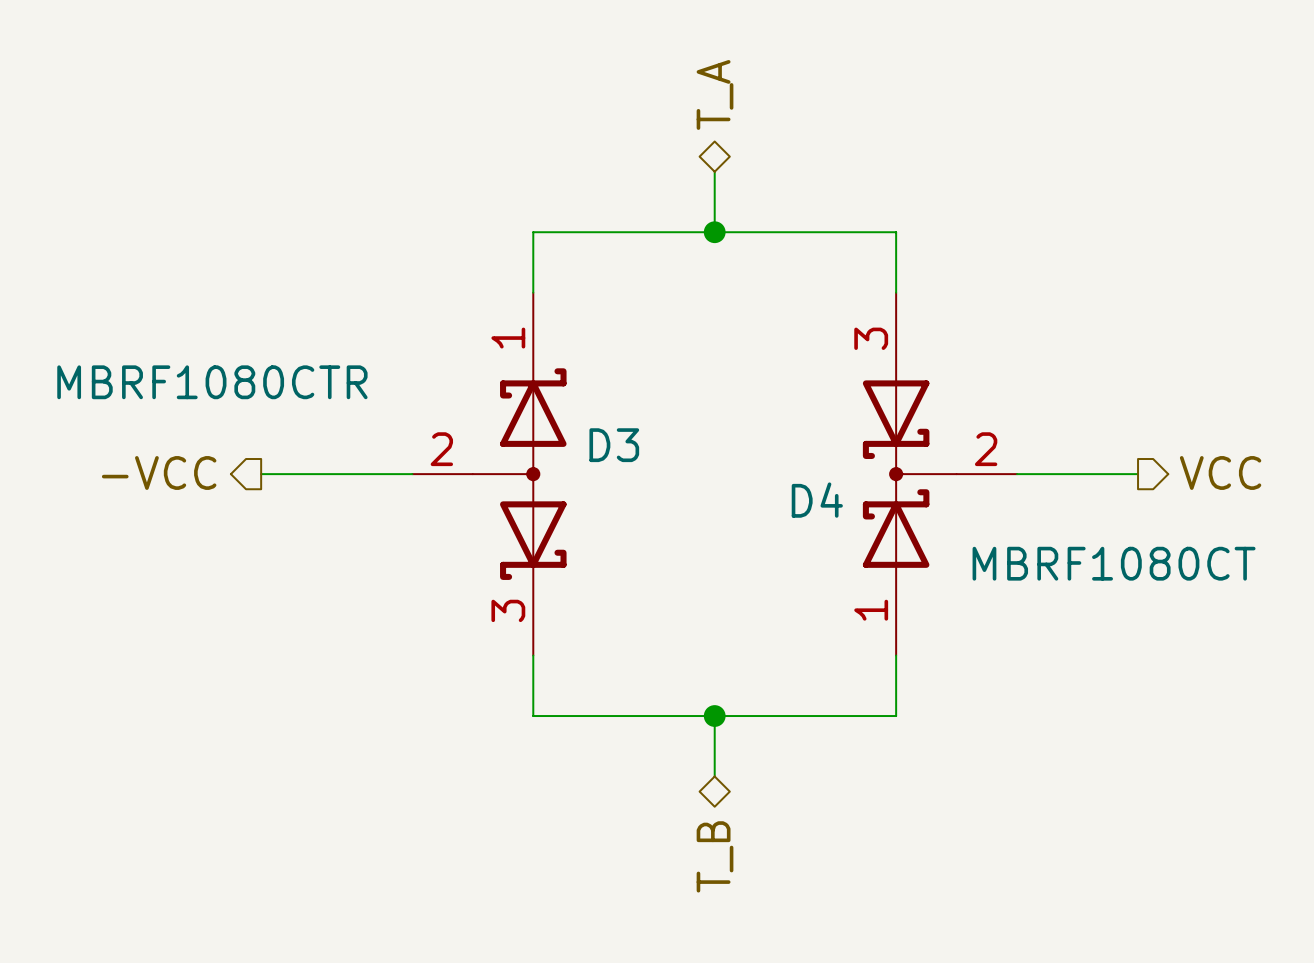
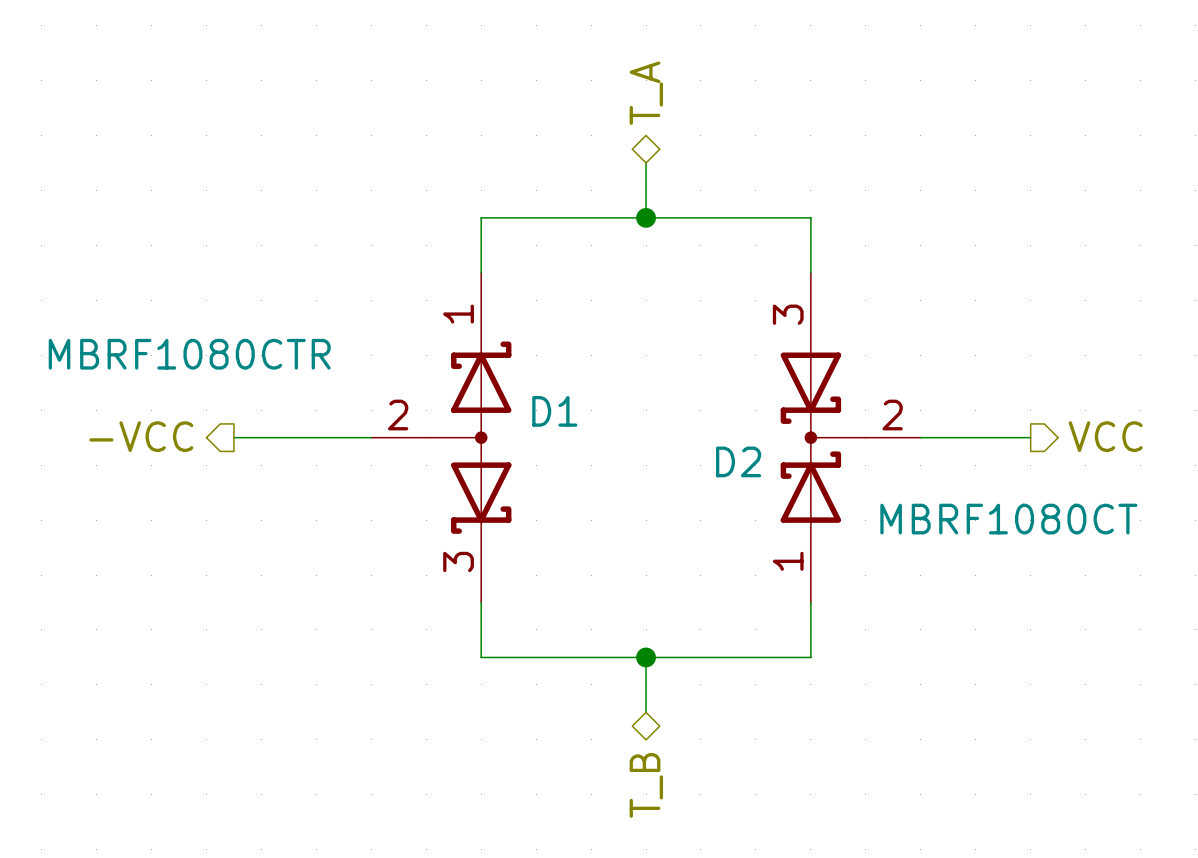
D3 name: D3 (614, 445) -> D1 (554, 411)
D4 name: D4 (817, 500) -> D2 (738, 461)

